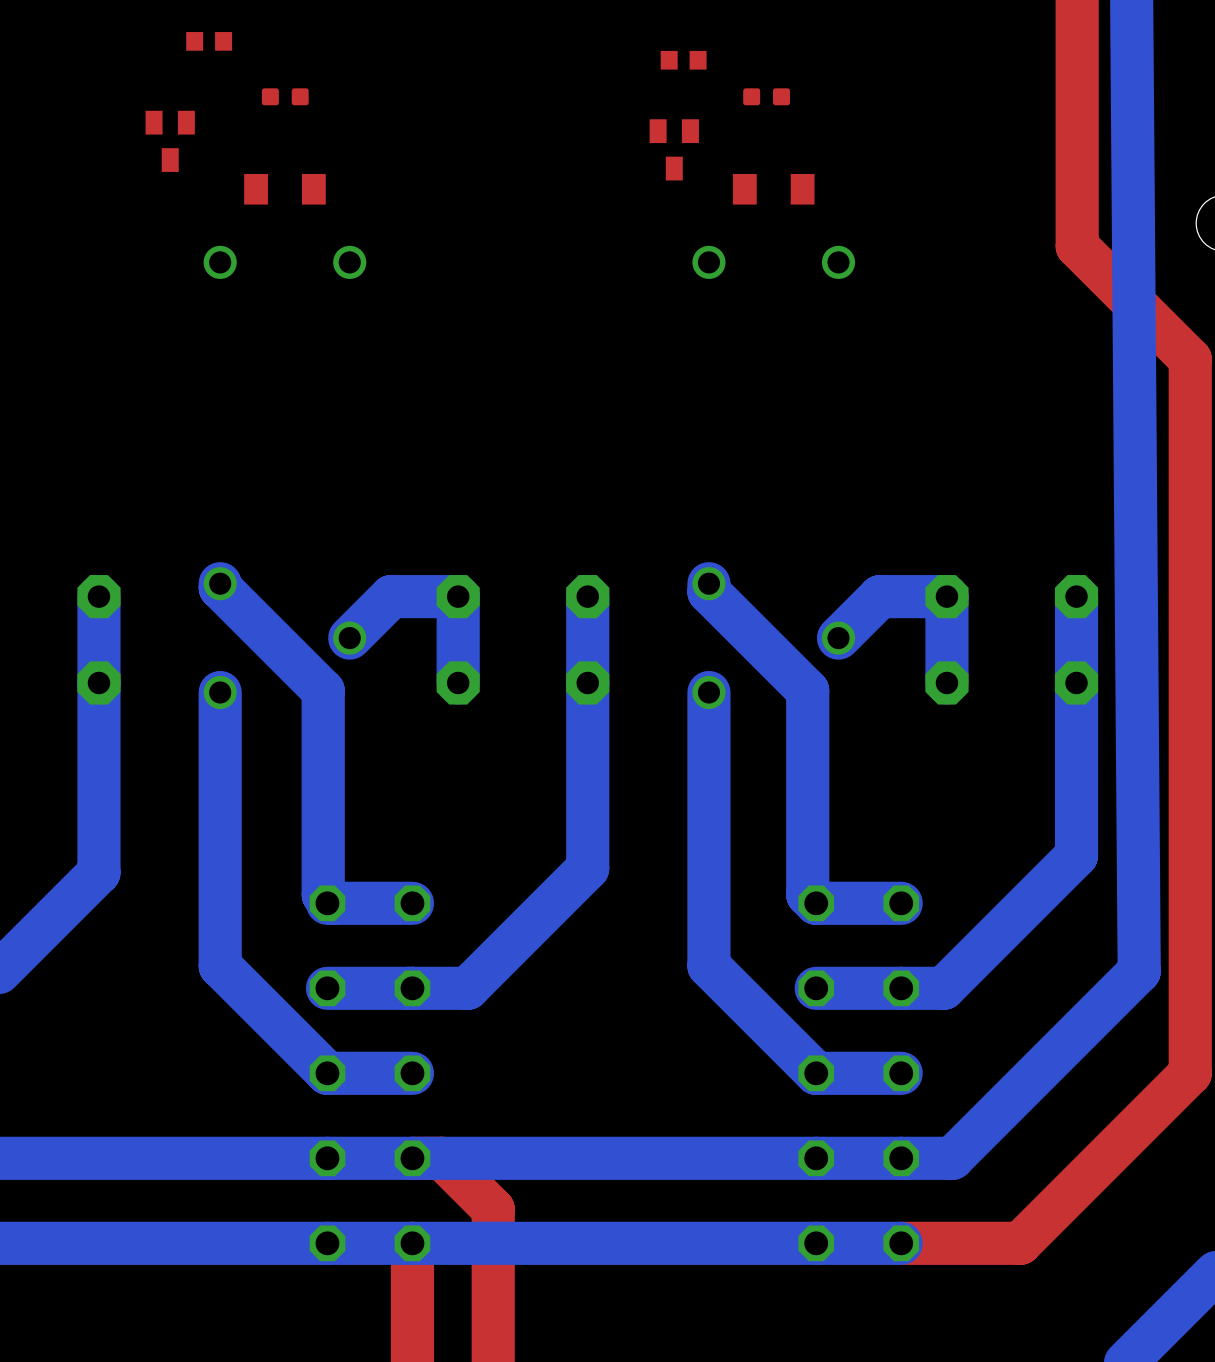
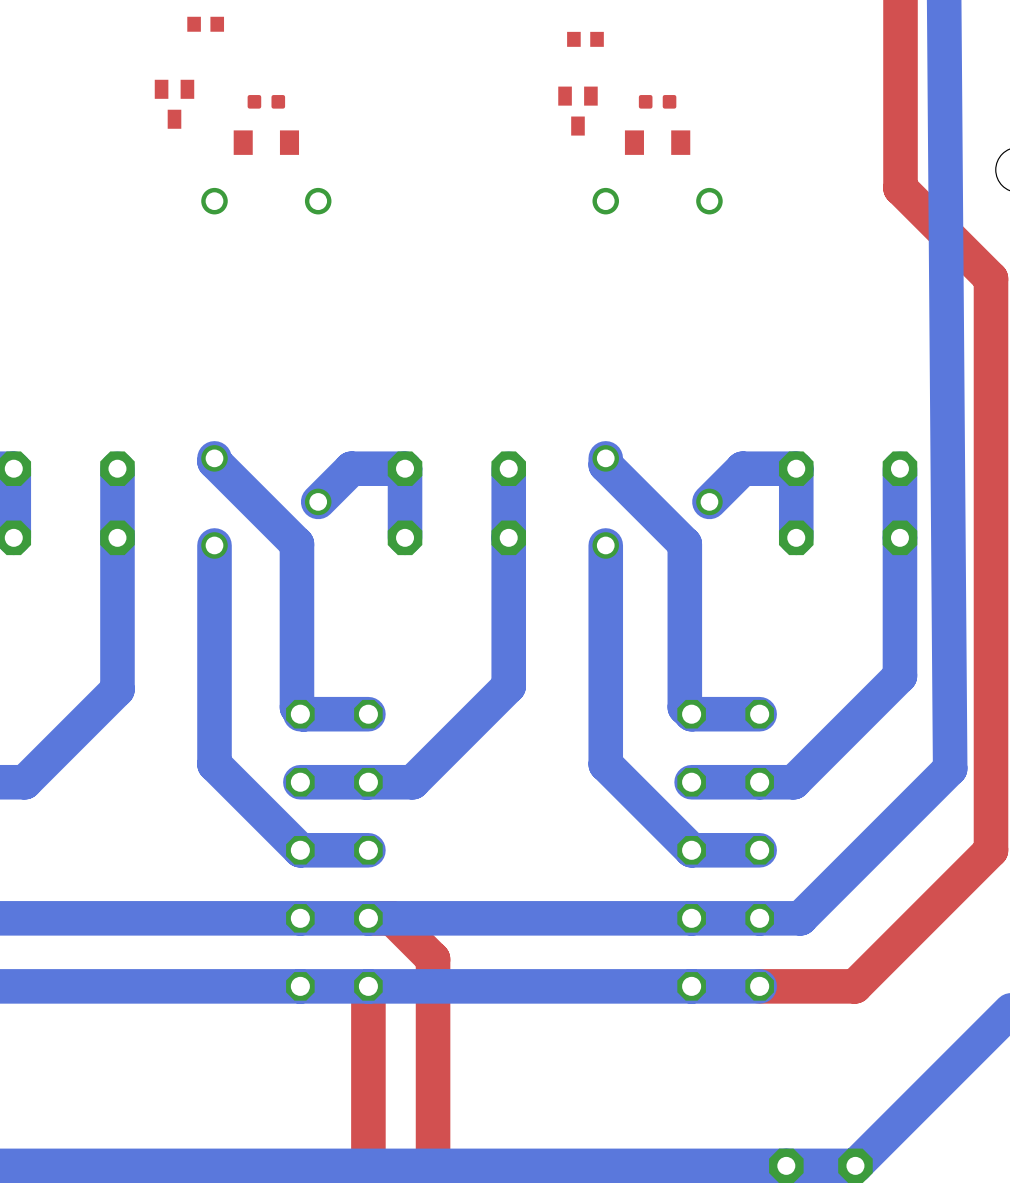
part position: (285, 96) -> (266, 101)
part position: (766, 96) -> (657, 101)

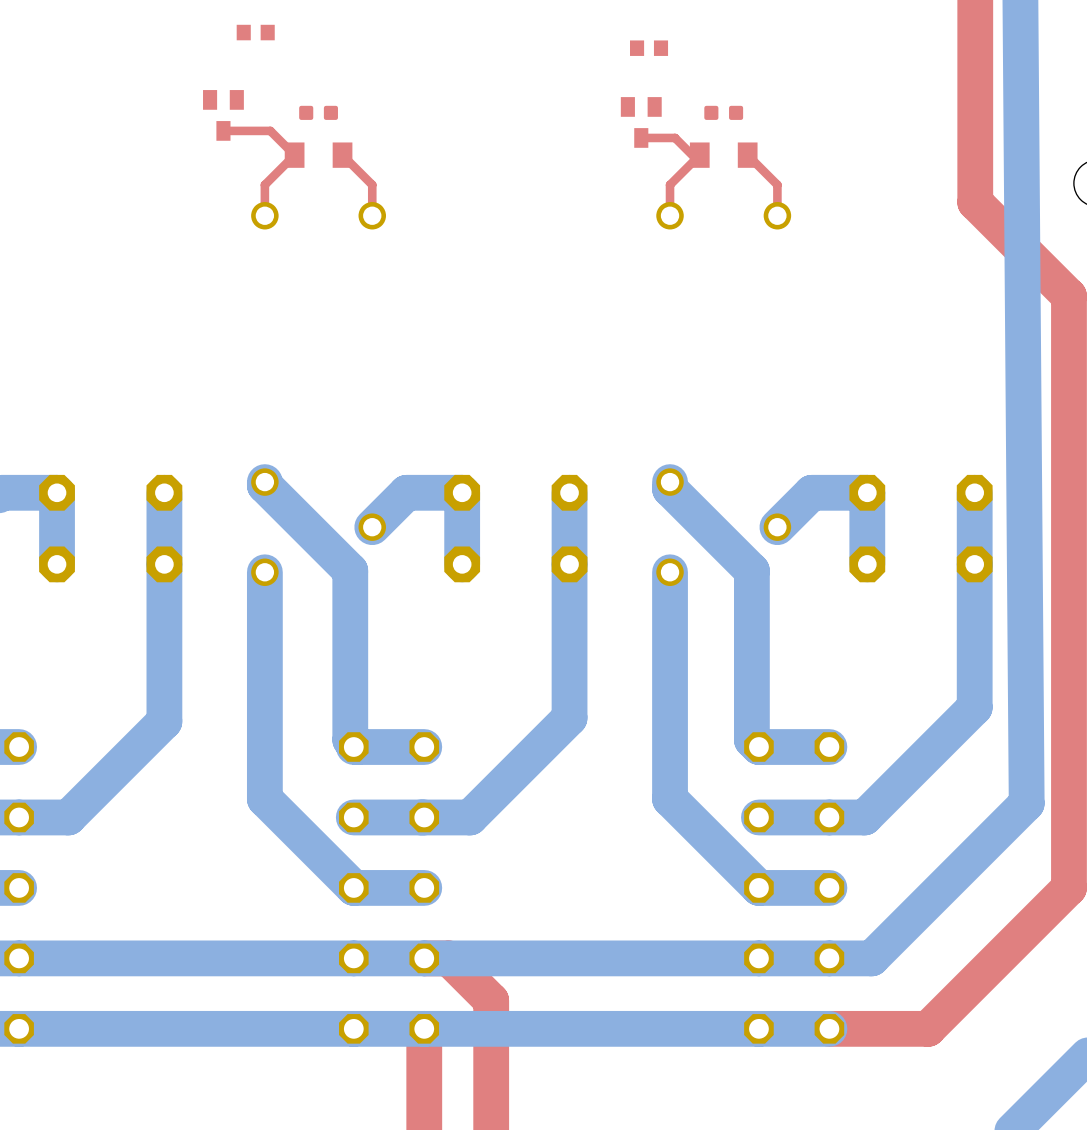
top track: none -> (223, 130) (270, 130) (294, 155) (264, 184) (264, 215)
top track: none -> (641, 137) (675, 137) (696, 158)
top track: none -> (342, 155) (372, 184) (372, 215)
top track: none -> (699, 155) (670, 184) (670, 215)
top track: none -> (747, 155) (777, 184) (777, 215)

